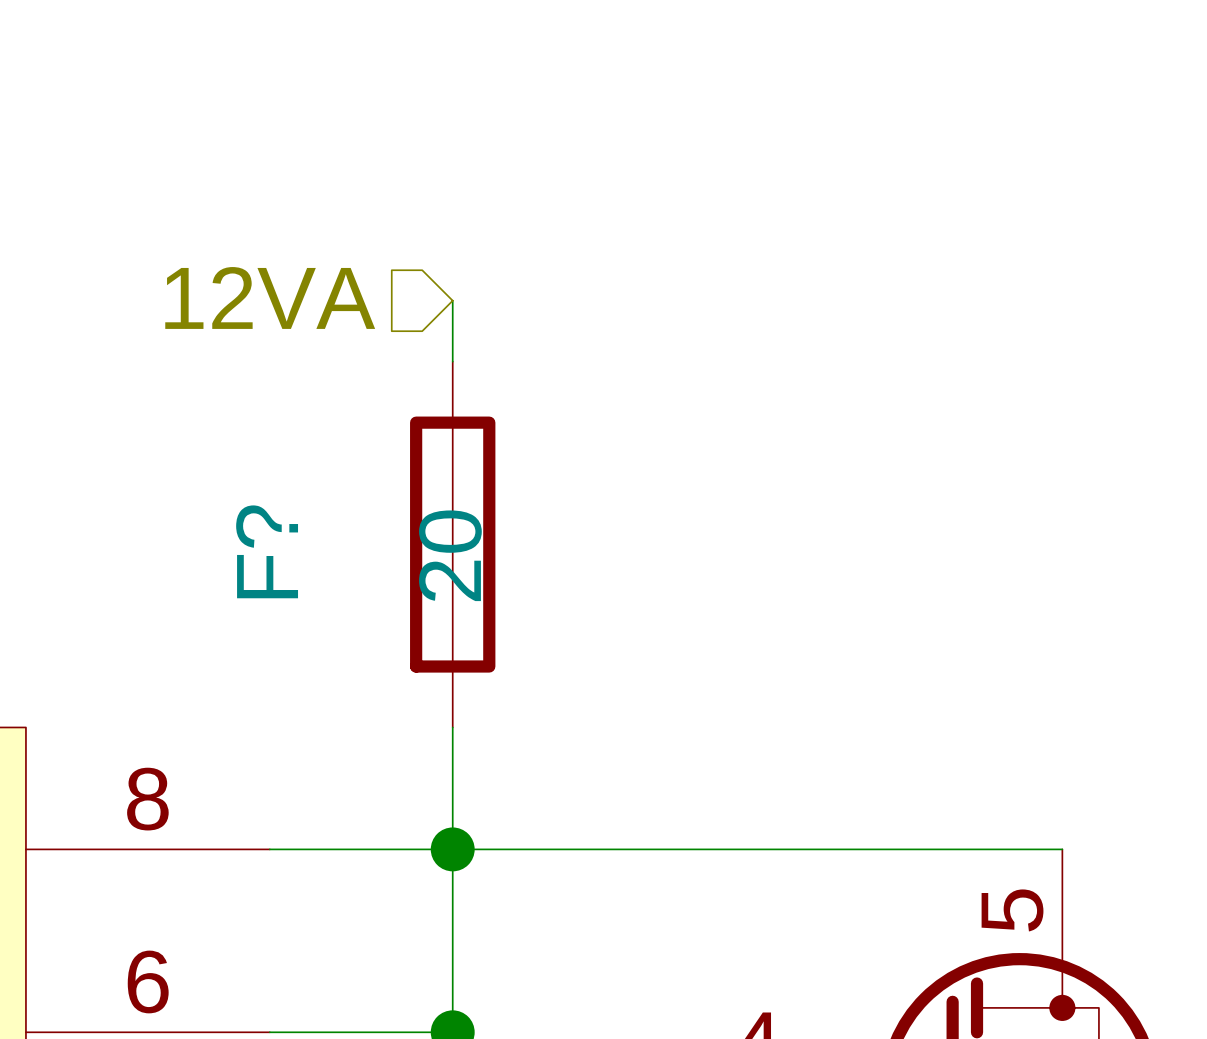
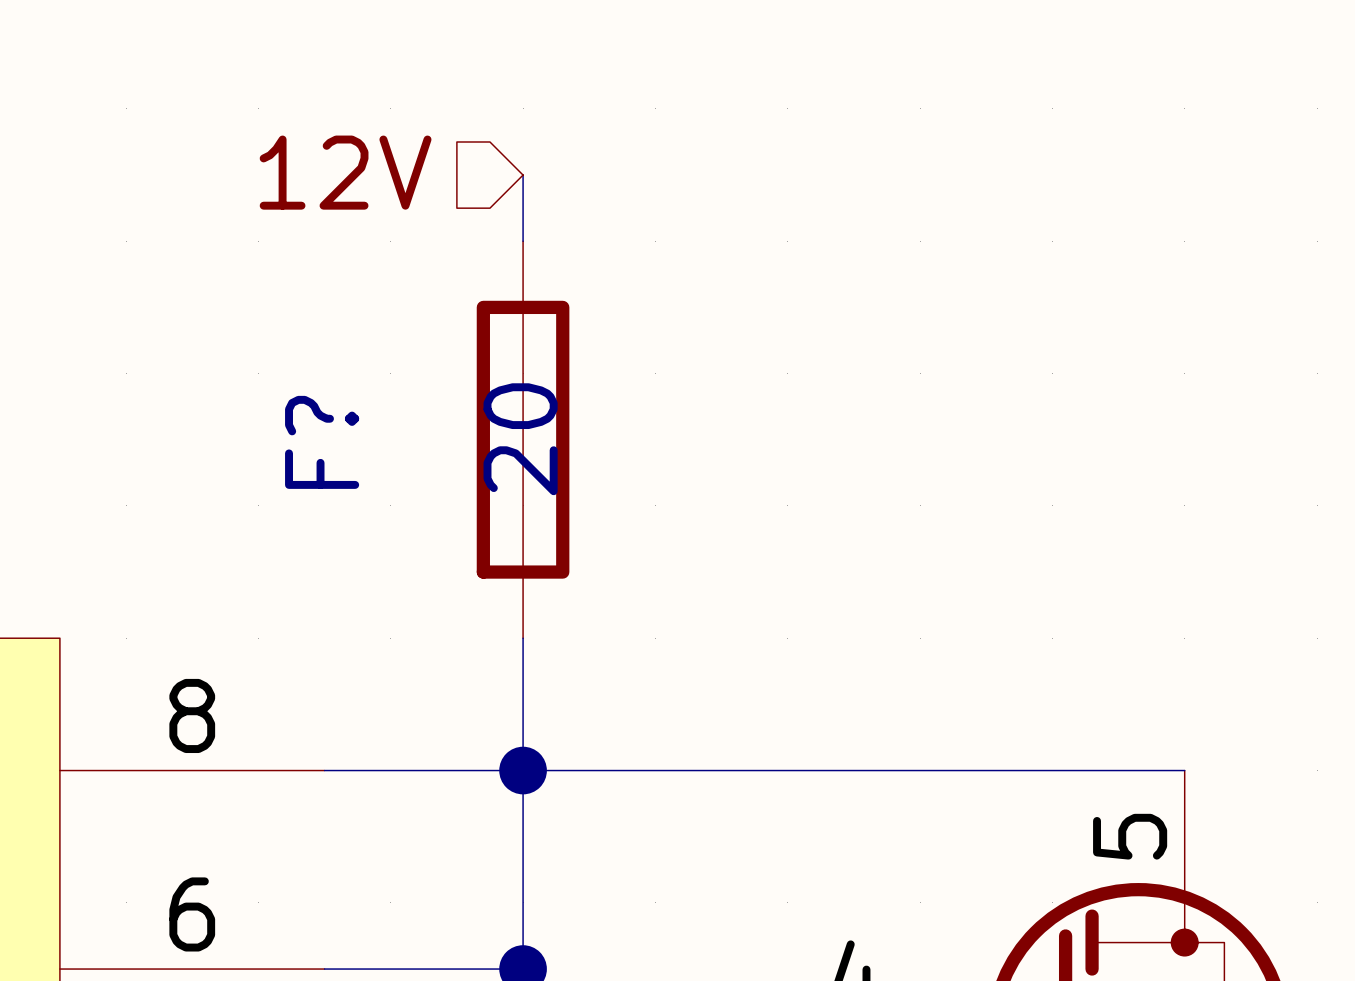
hierarchical label: 12VA (270, 297) -> 12V (345, 172)

